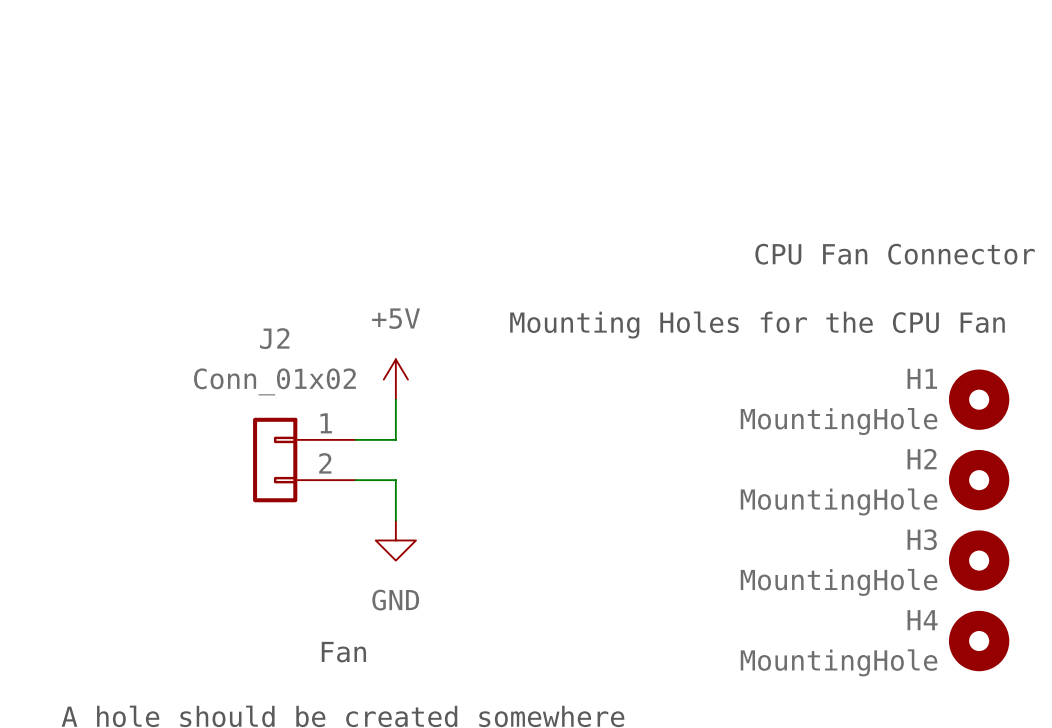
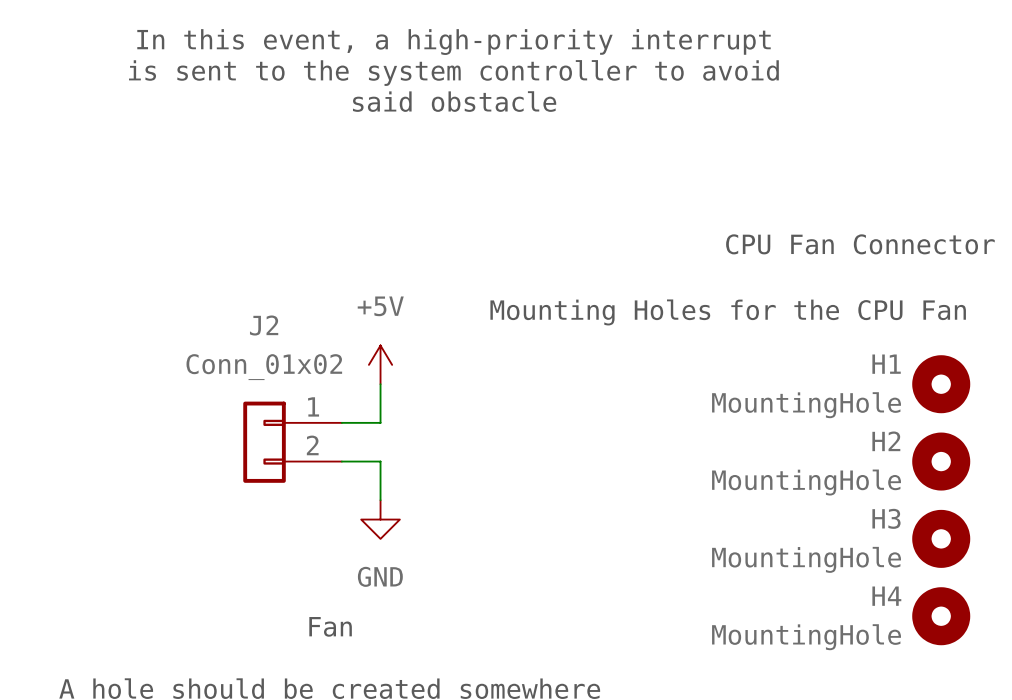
text: none -> In this event, a high-priority interrupt (454, 42)
text: none -> is sent to the system controller to avoid (453, 73)
text: none -> said obstacle (454, 101)

